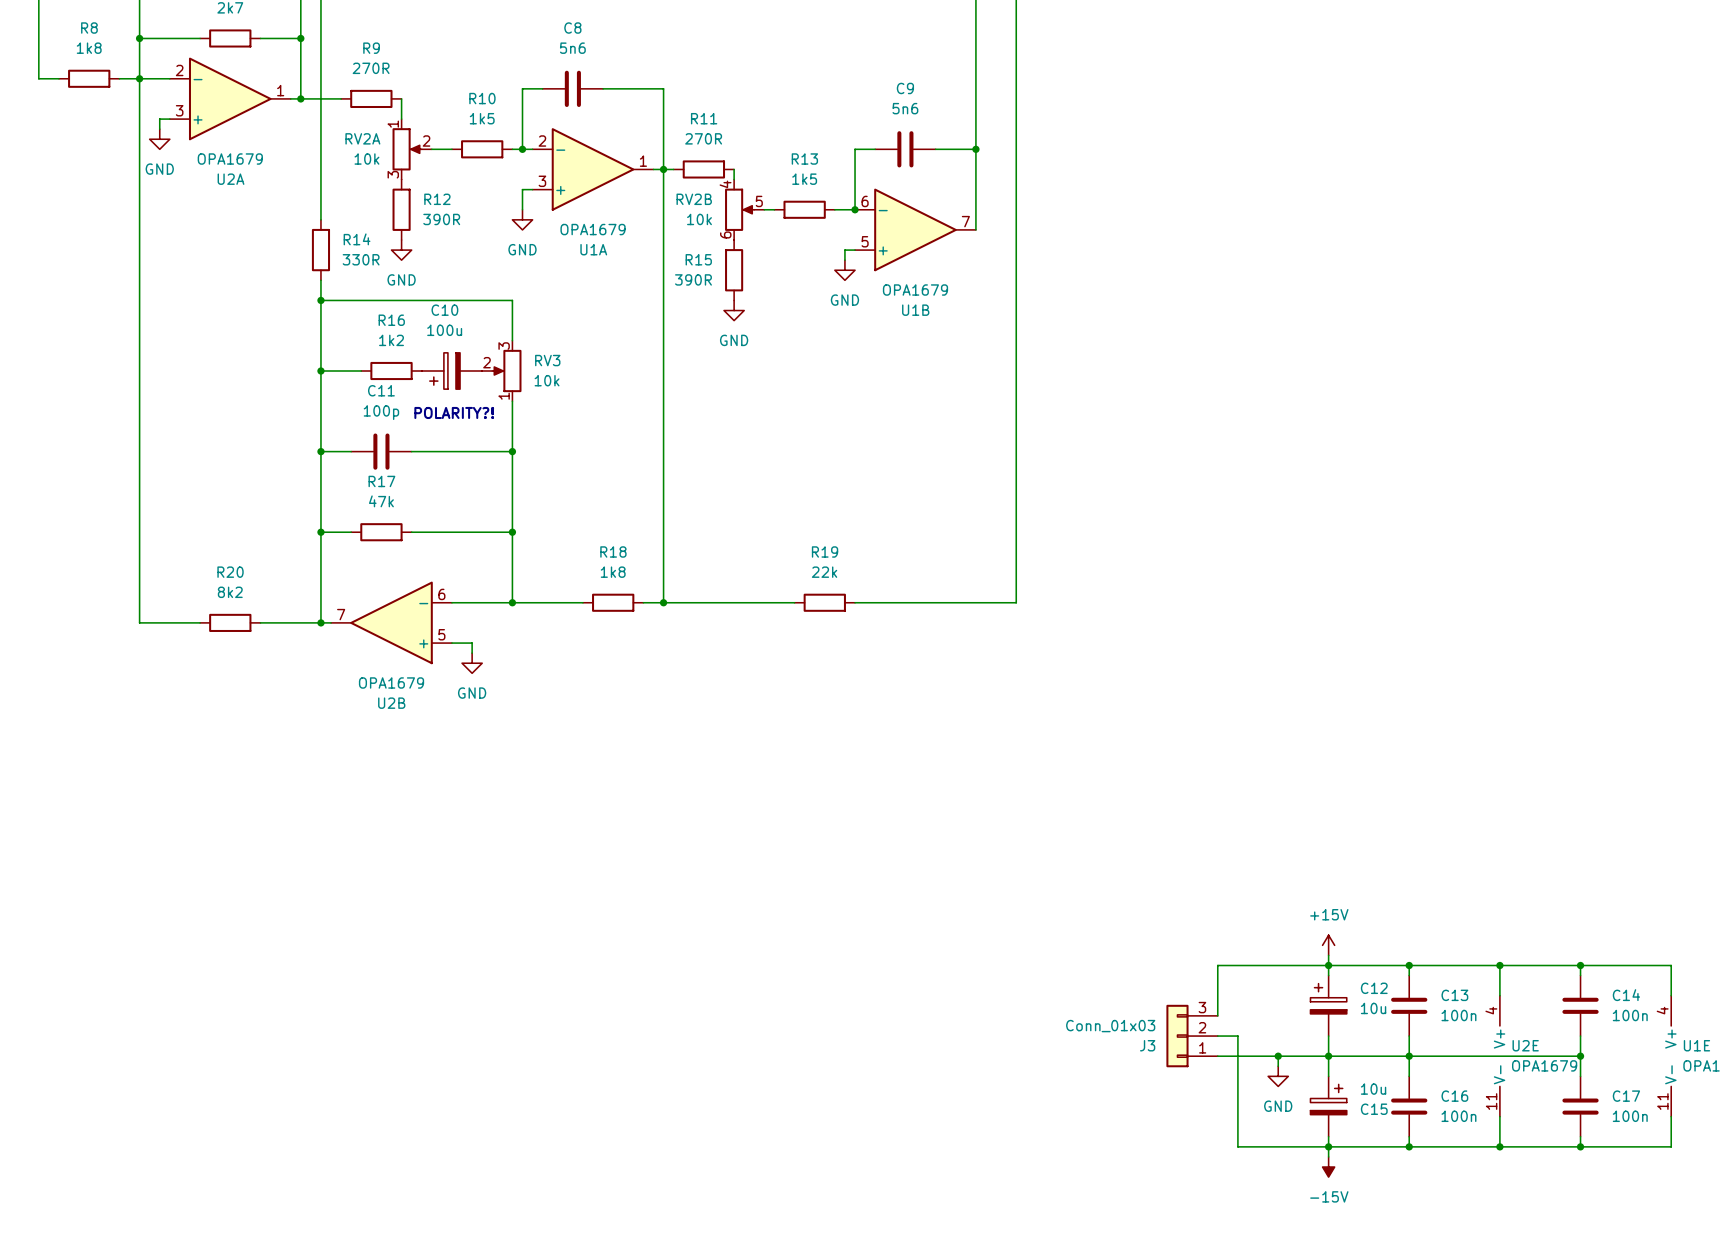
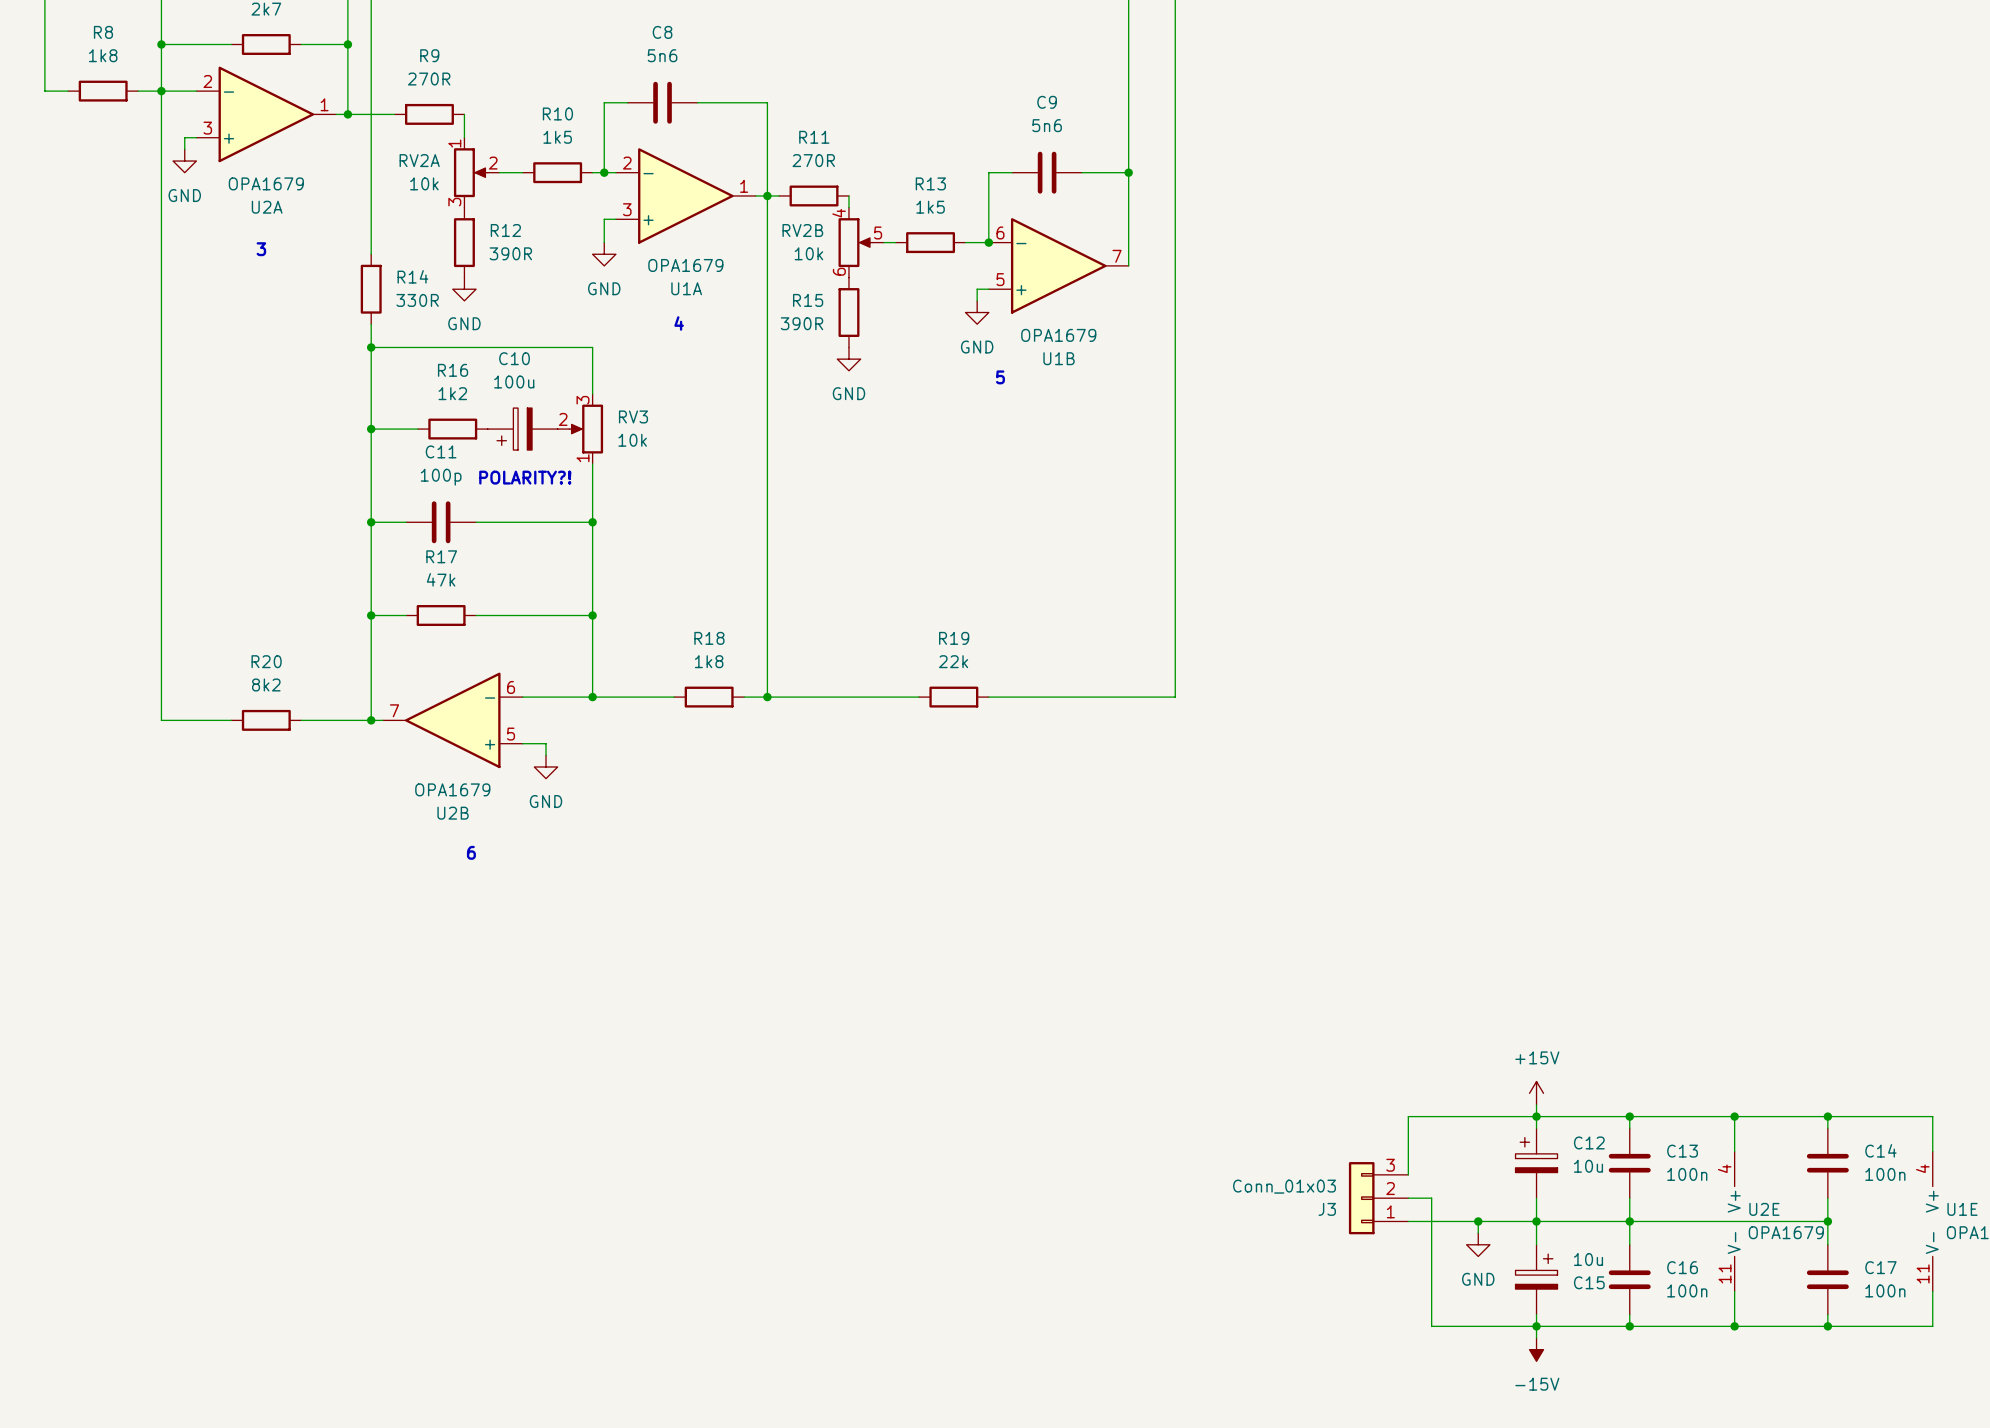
text: none -> 3 (261, 249)
text: none -> 4 (679, 323)
text: none -> 5 (1000, 377)
text: none -> 6 (471, 852)

